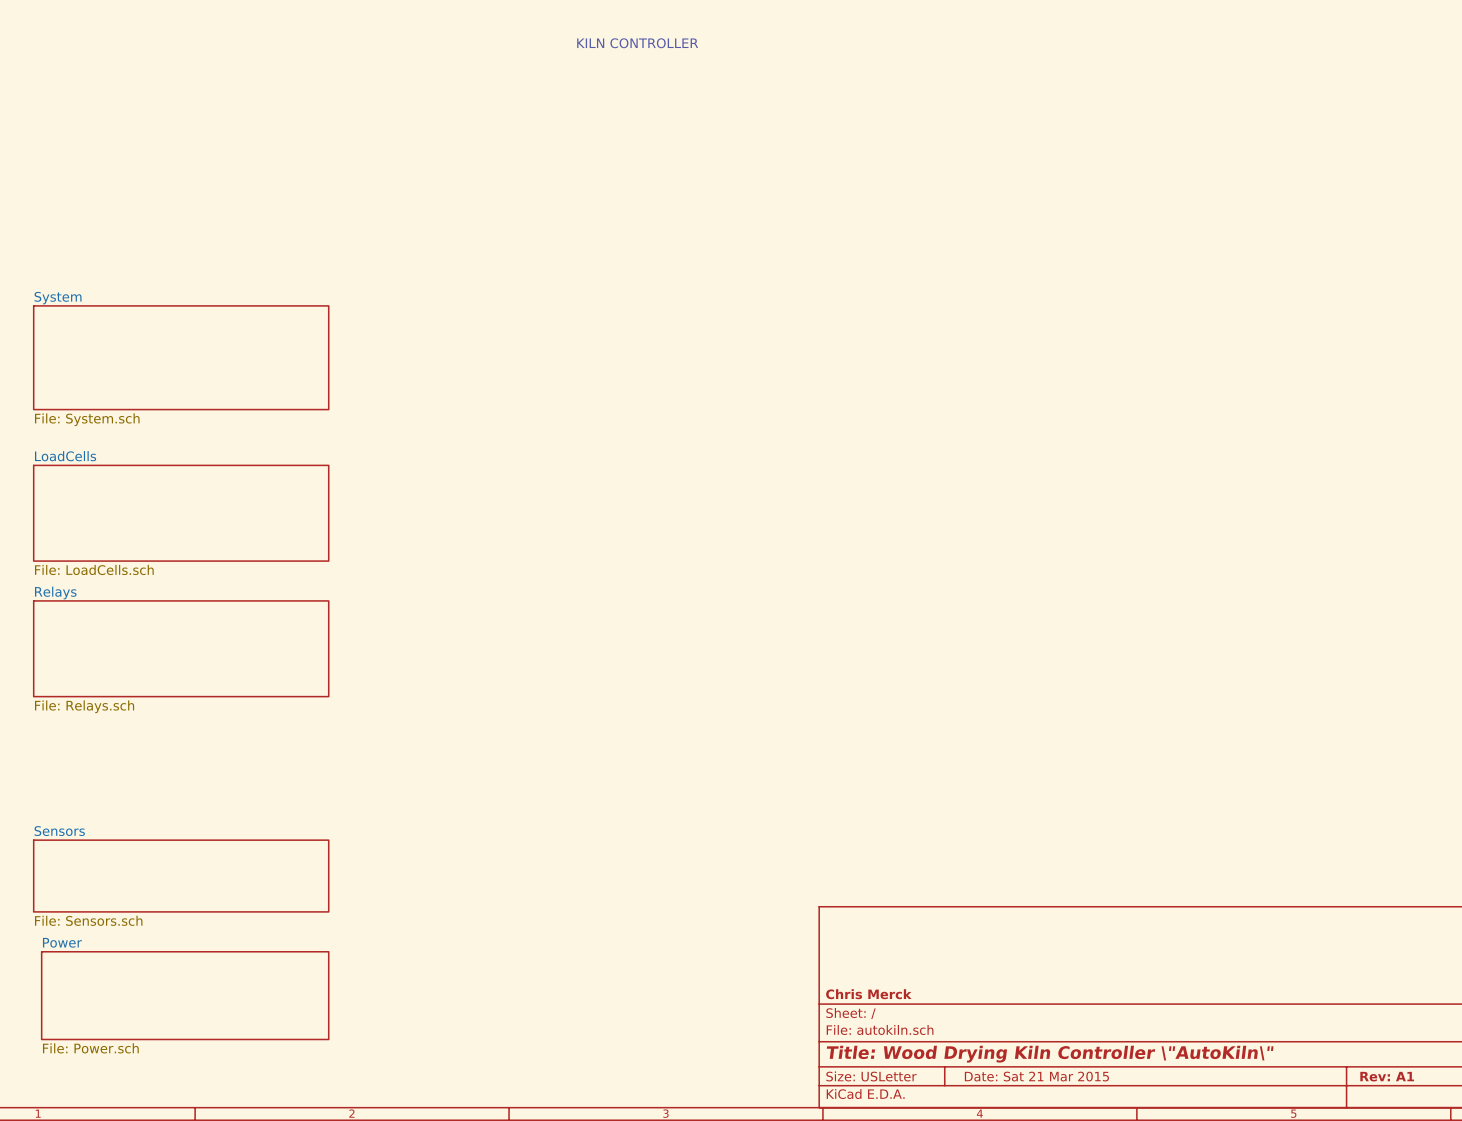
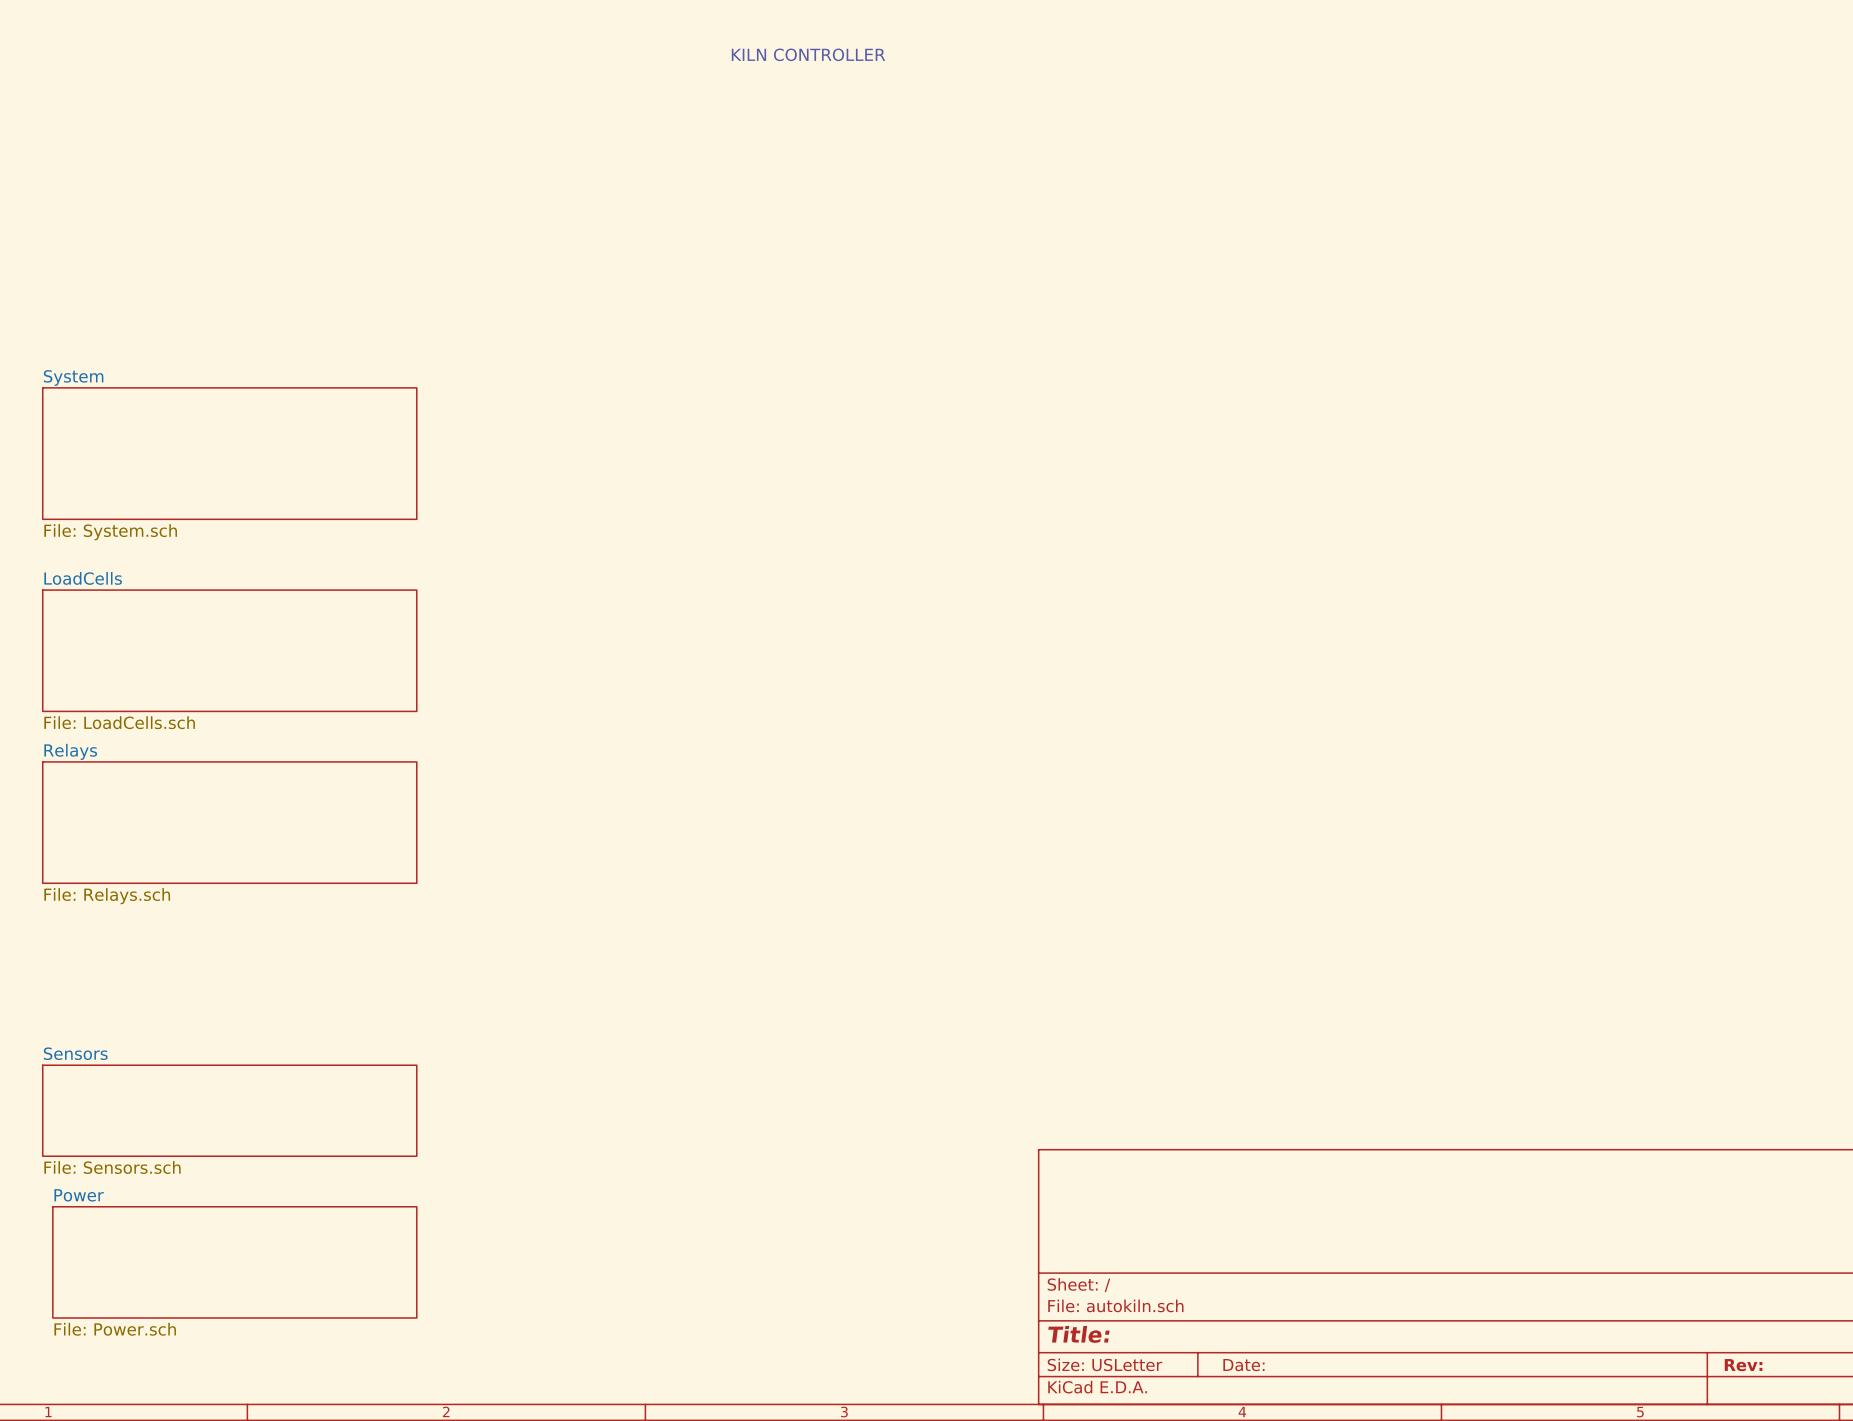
title block: Chris Merck (868, 994) -> none
title block: Title: Wood Drying Kiln Controller \"AutoKiln\" (1050, 1054) -> Title: (1078, 1334)
title block: Date: Sat 21 Mar 2015 (1036, 1076) -> Date: (1243, 1365)
title block: Rev: A1 (1387, 1076) -> Rev: (1743, 1365)

